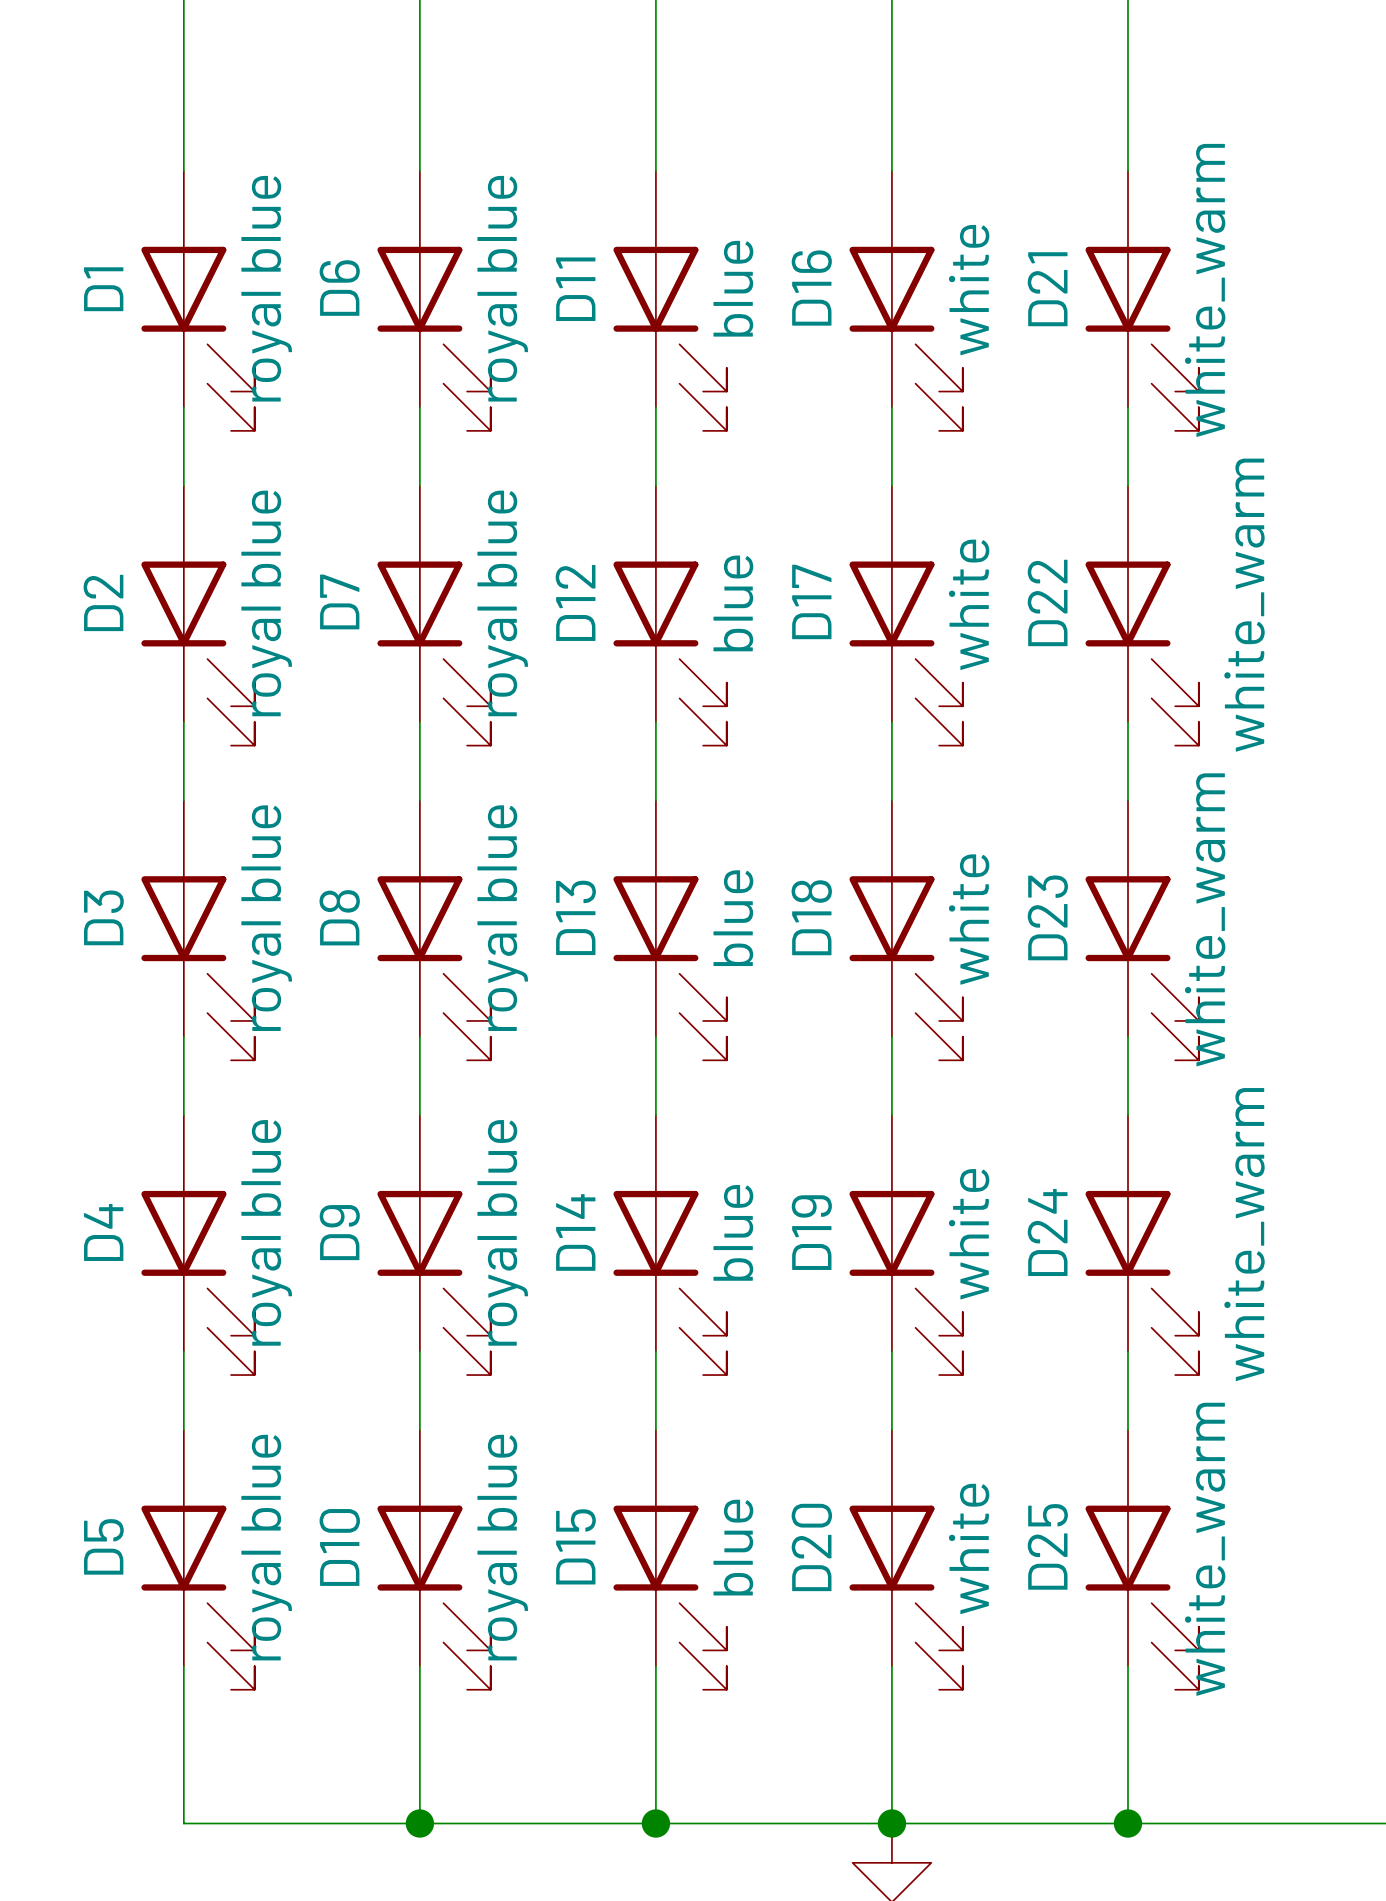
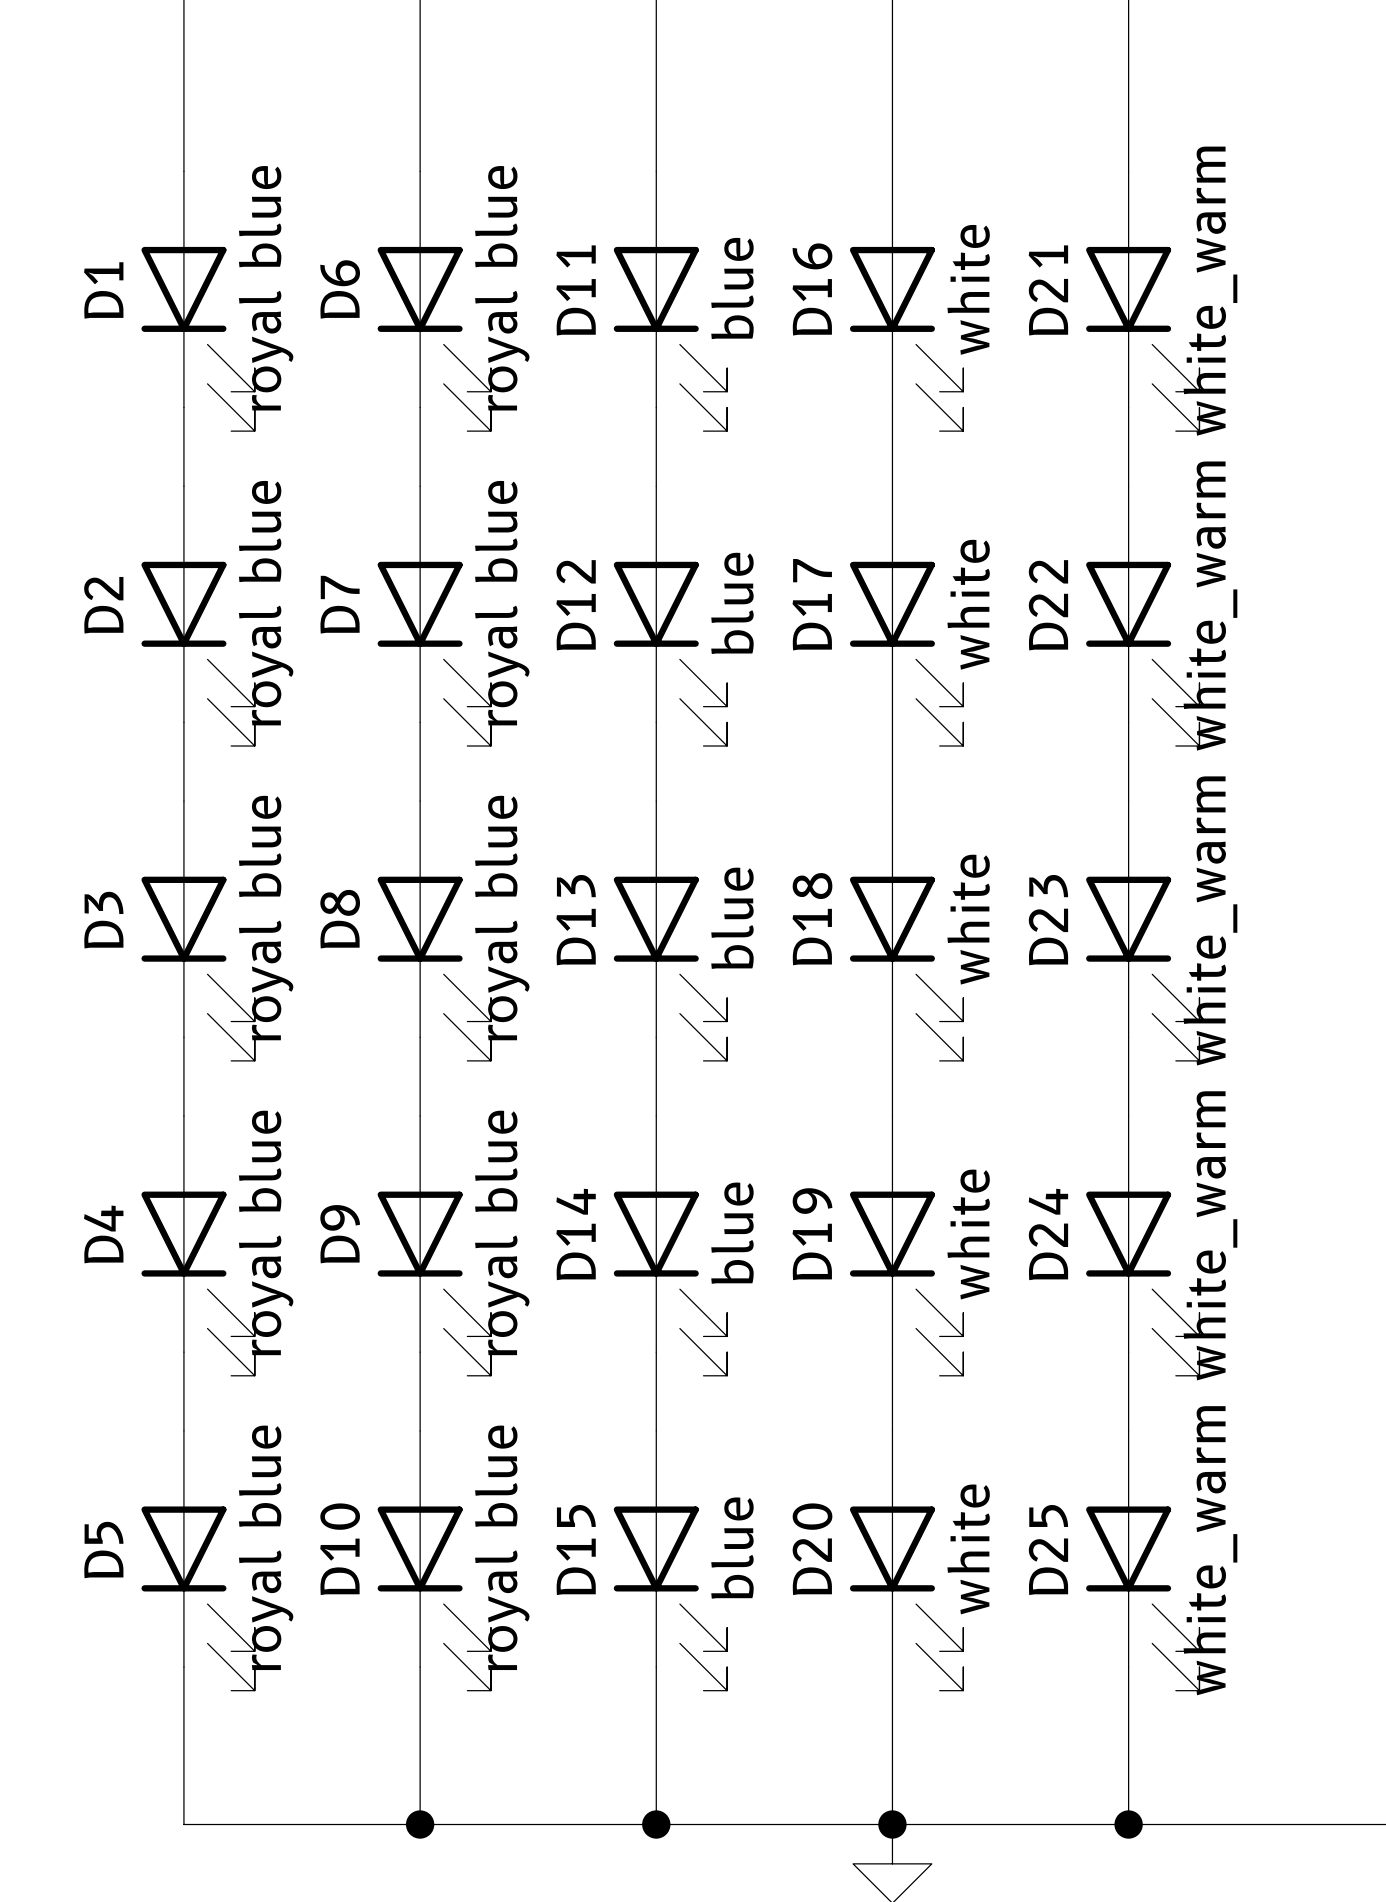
D22 value position: white_warm (1244, 605) -> white_warm (1210, 606)
D24 value position: white_warm (1244, 1234) -> white_warm (1210, 1235)

